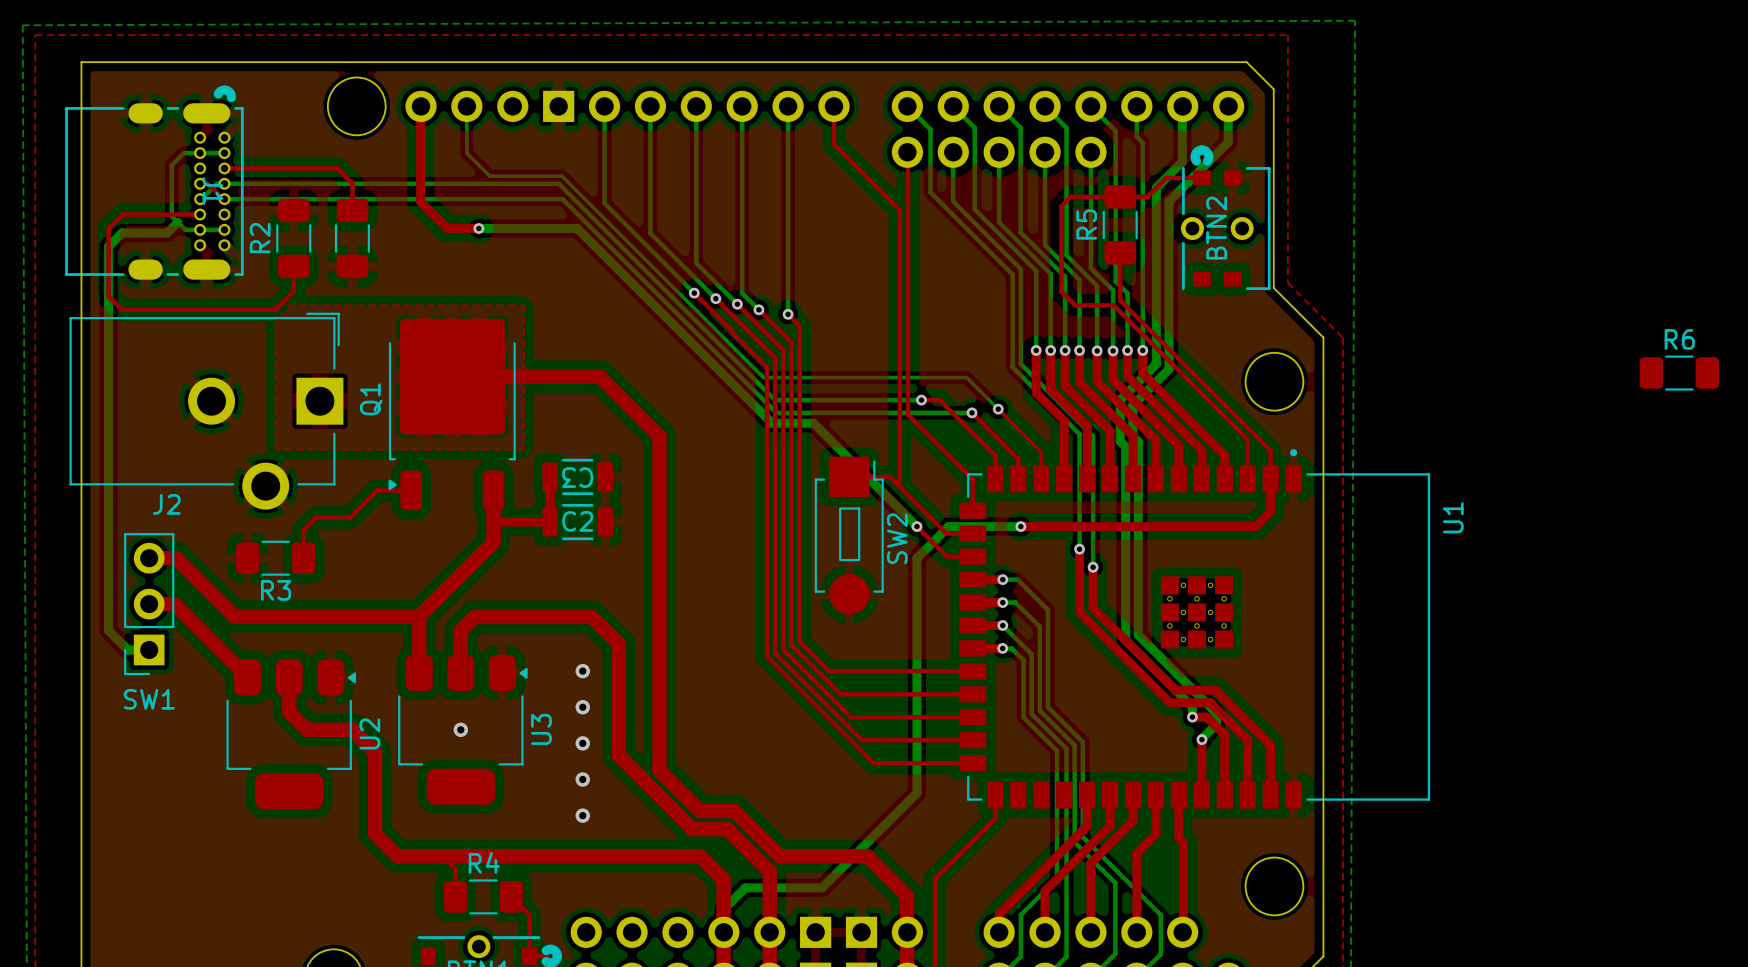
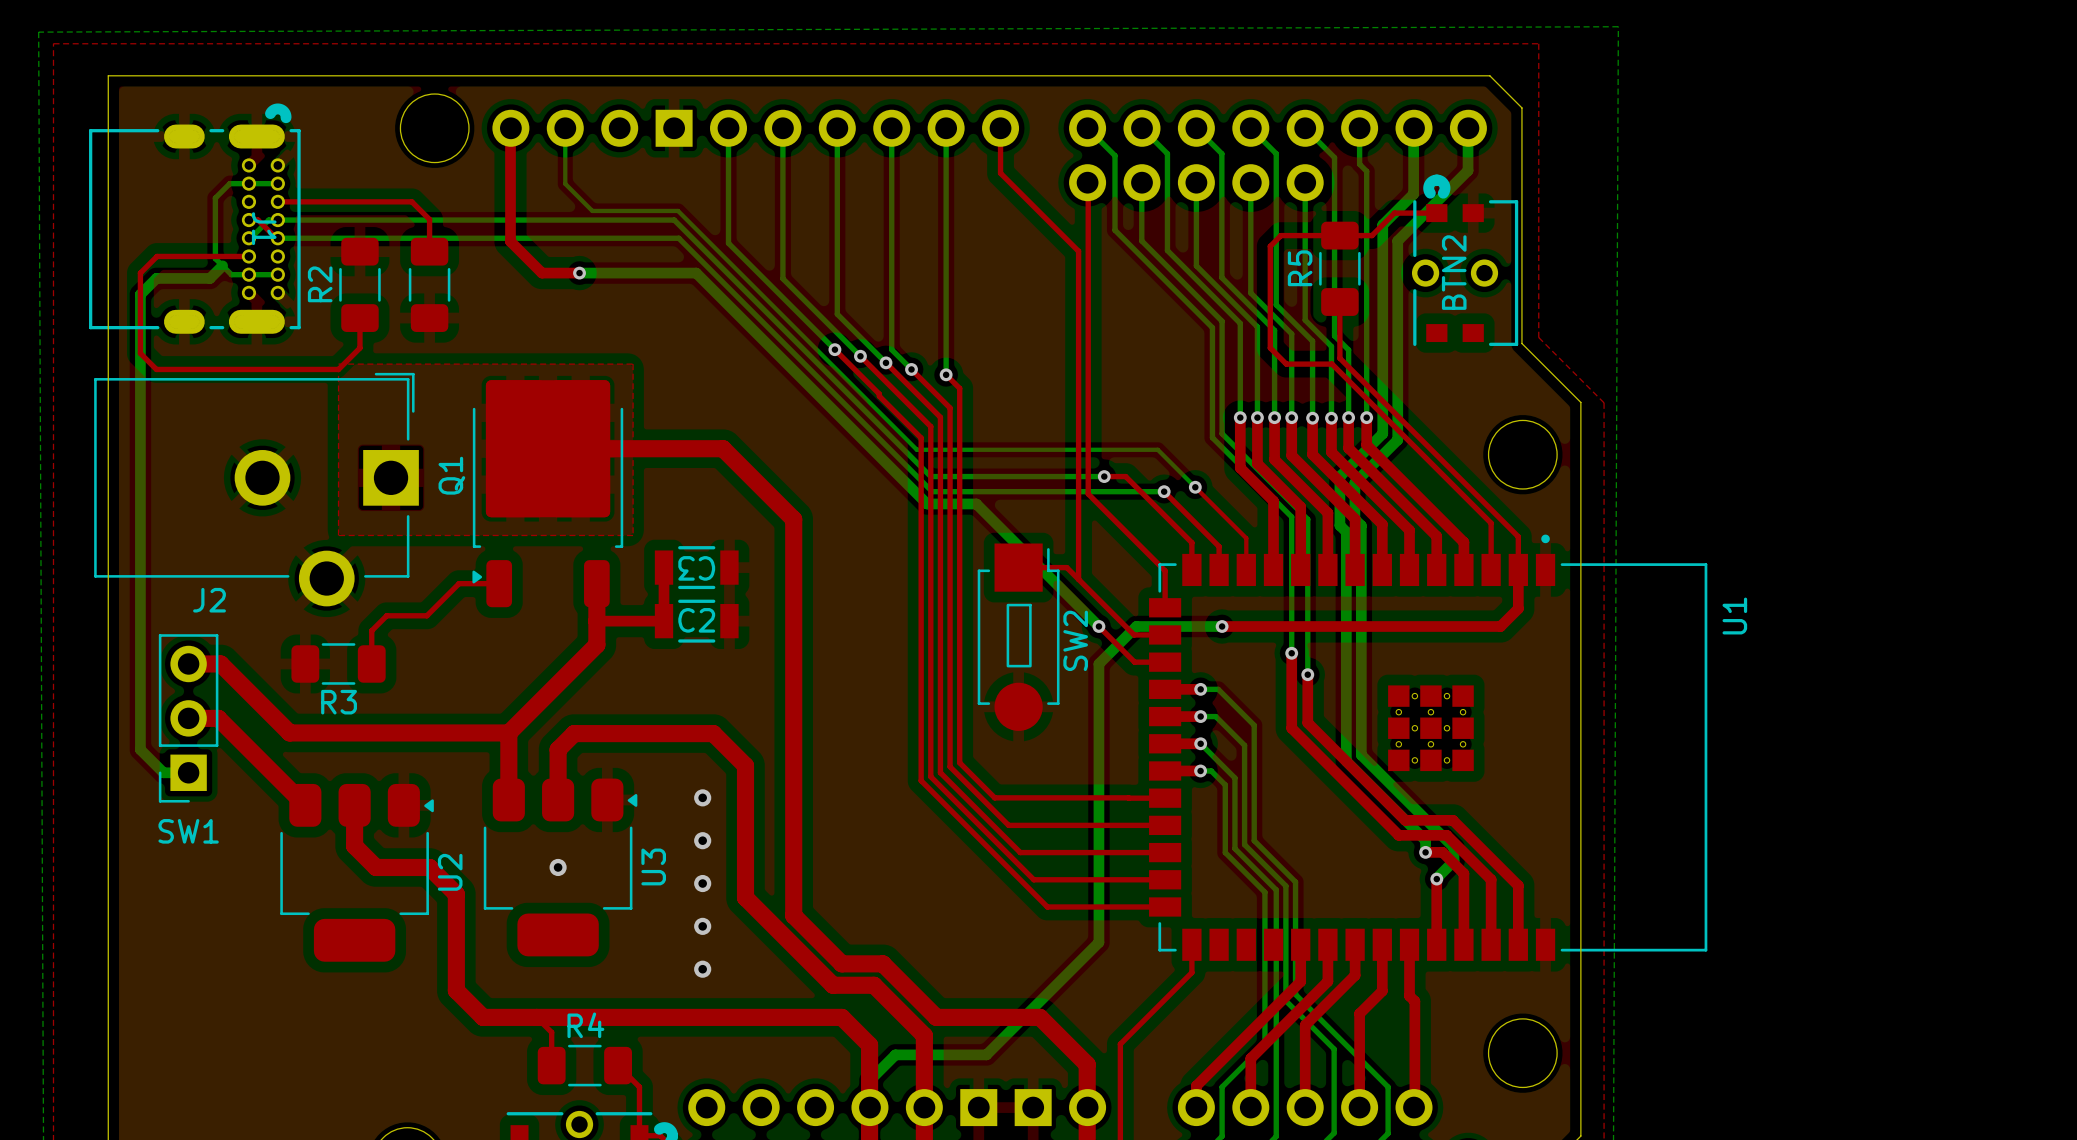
R6: (1679, 373) -> none

